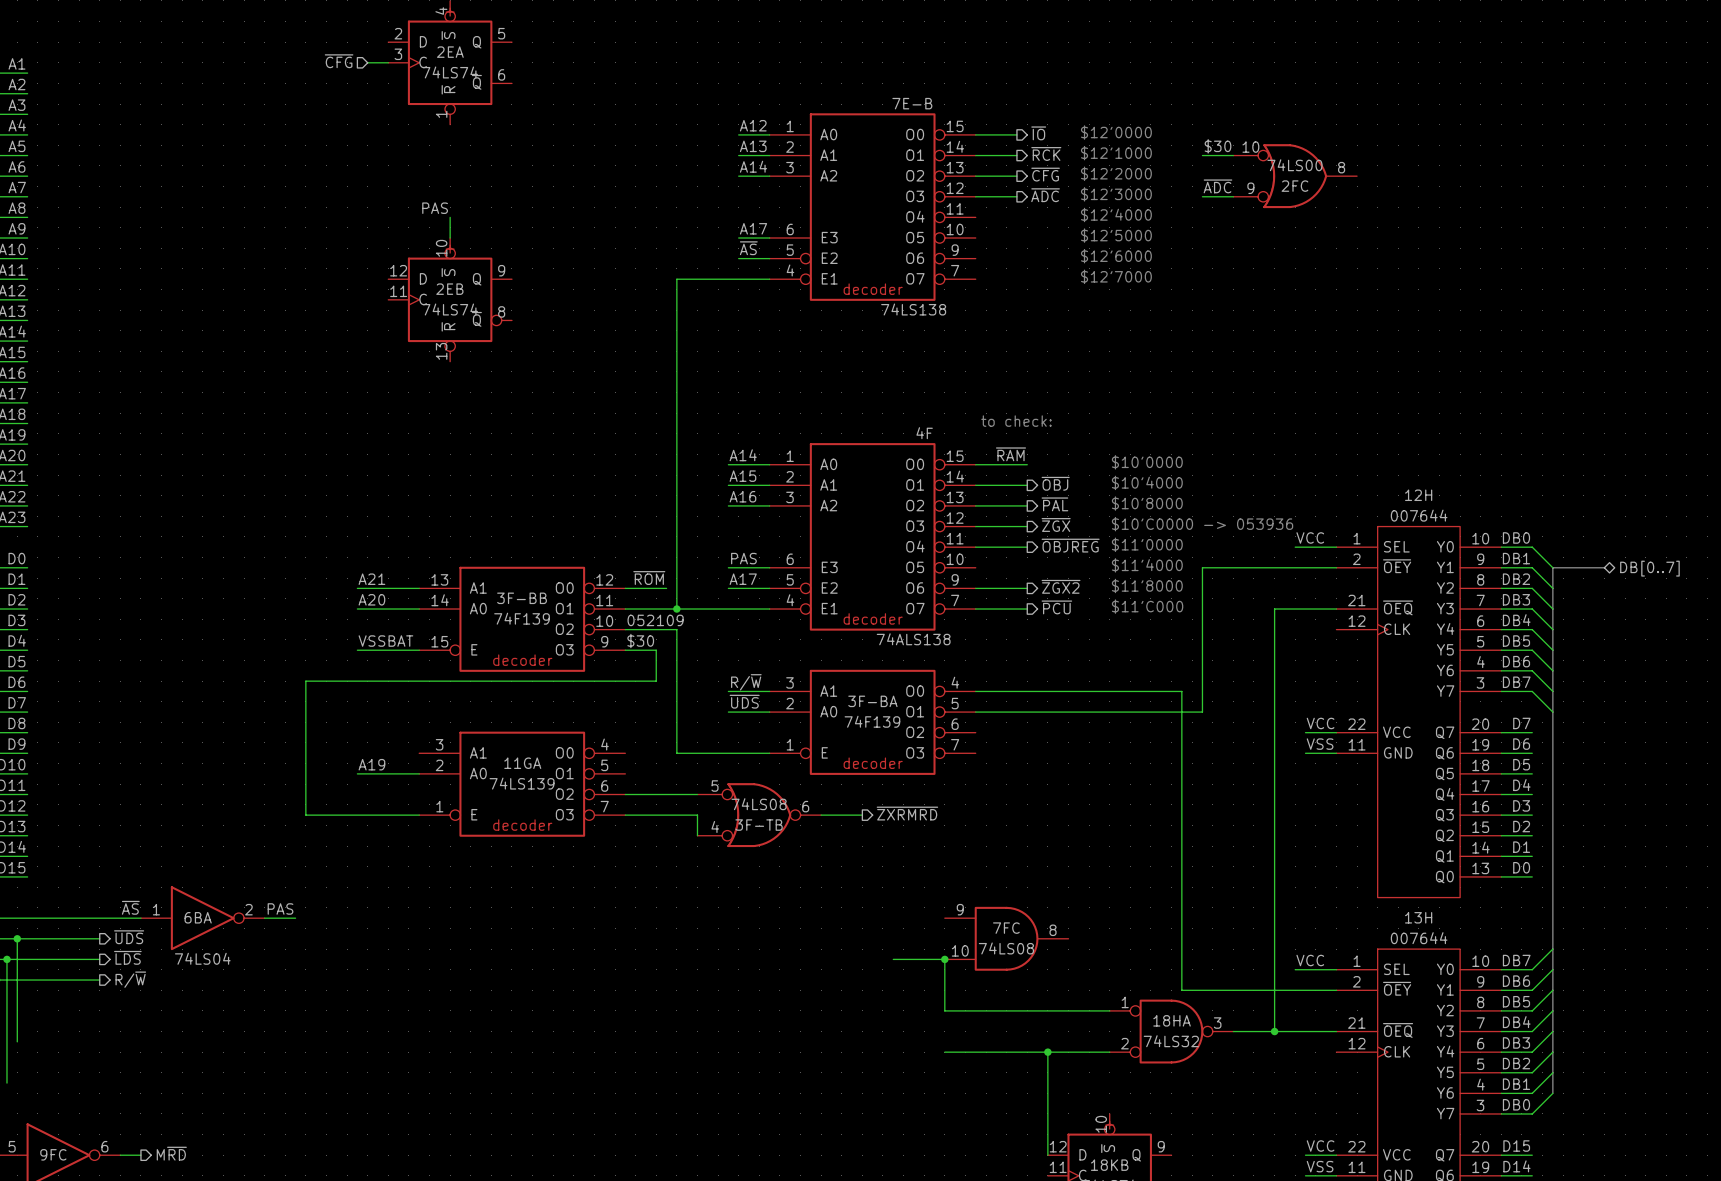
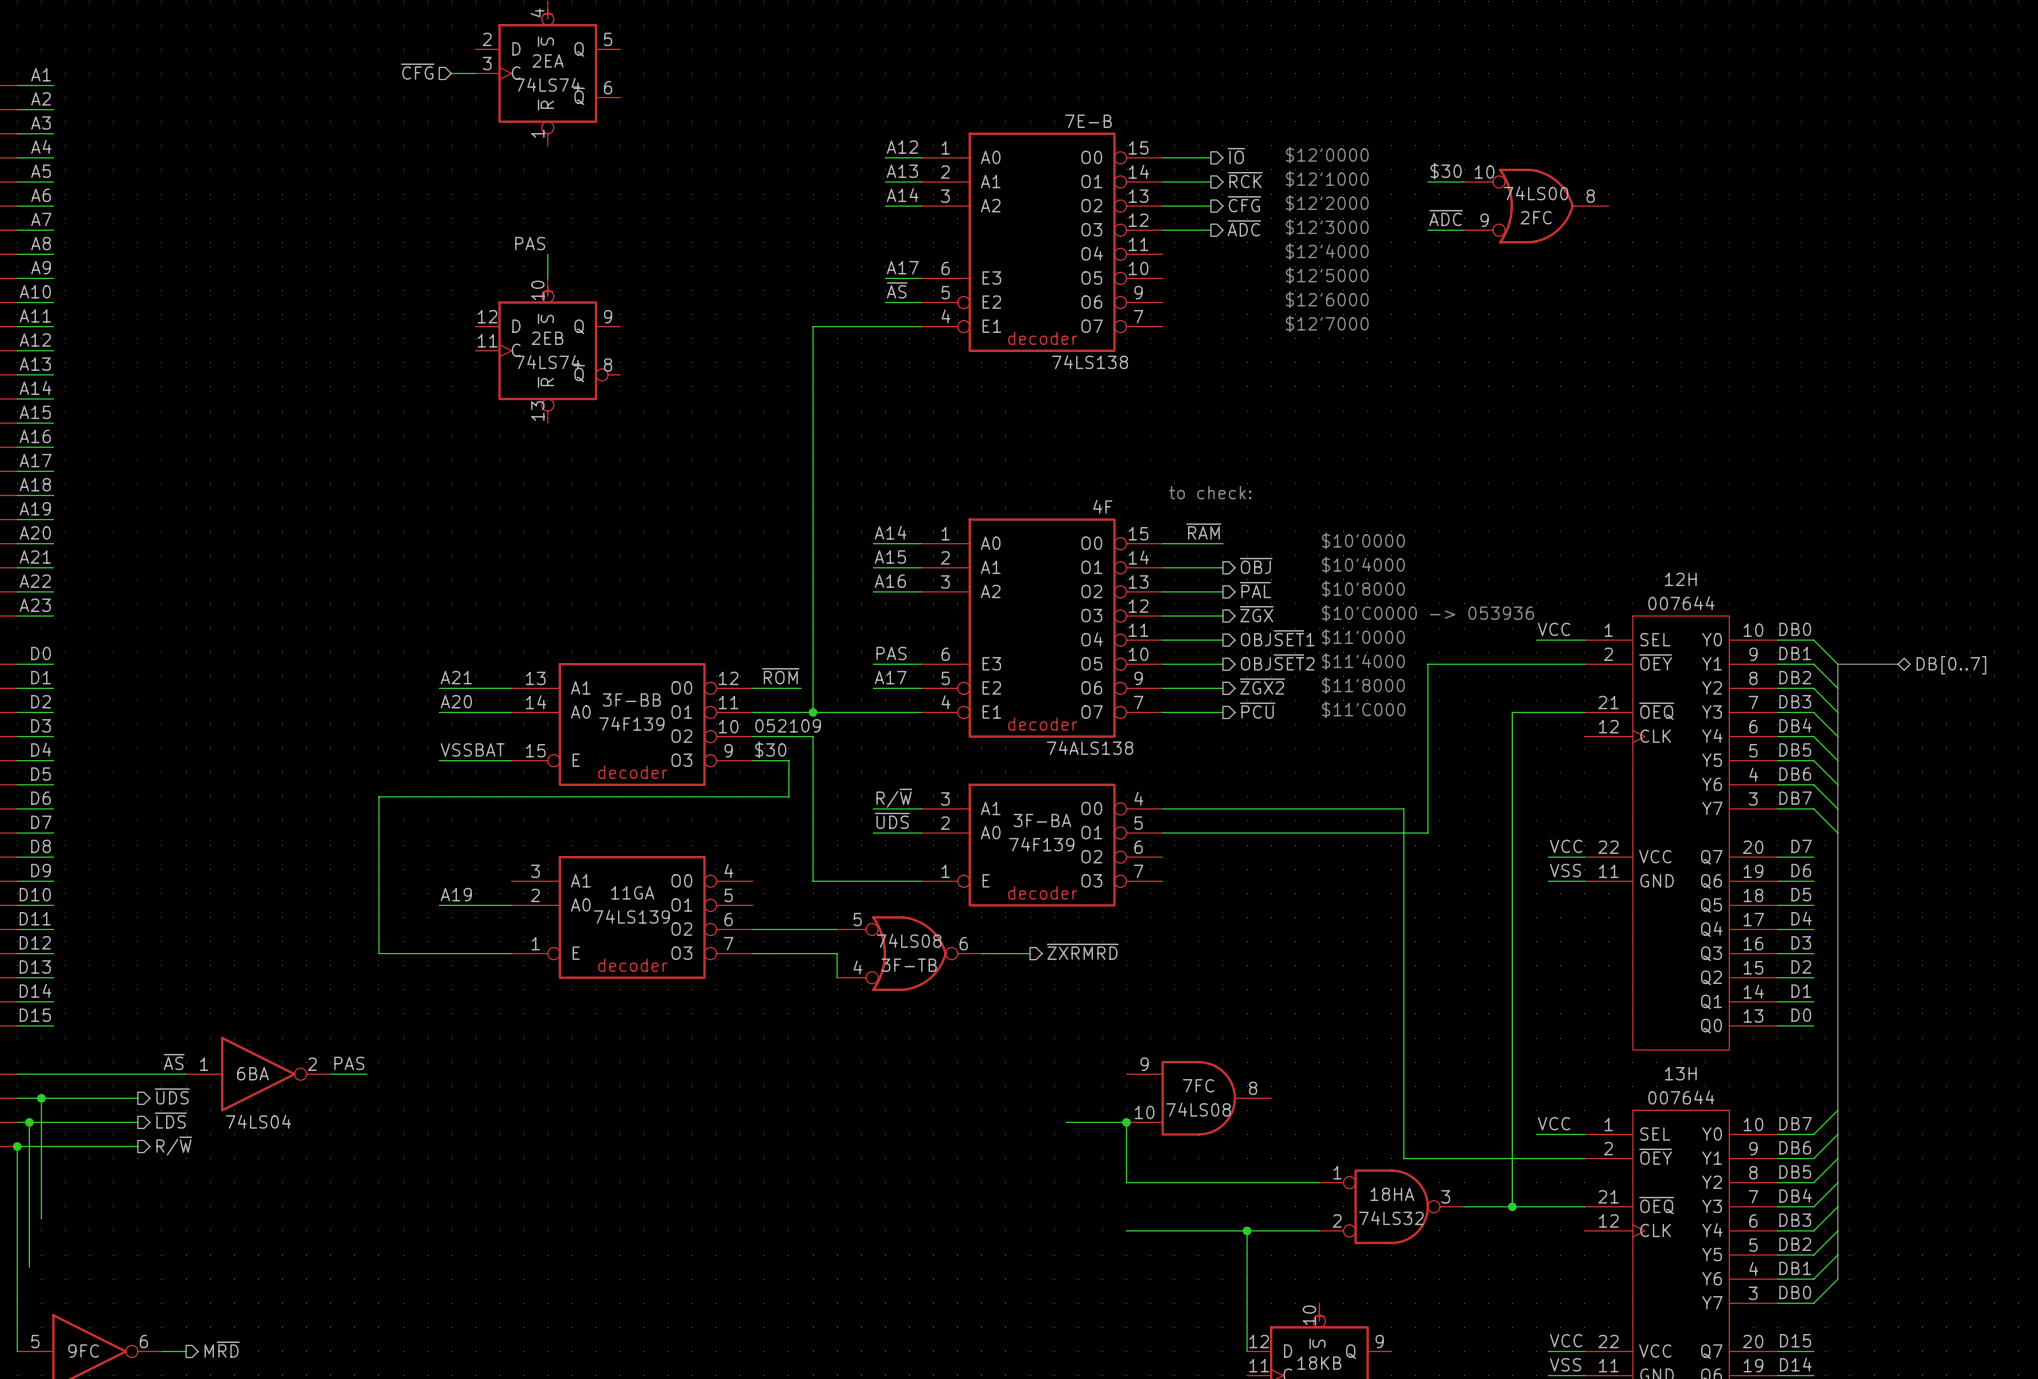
hierarchical label: ~{OBJREG} (1070, 545) -> OBJ~{SET}1 (1277, 638)
hierarchical label: none -> OBJ~{SET}2 (1277, 662)
wire: none -> (1162, 664) (1222, 664)

